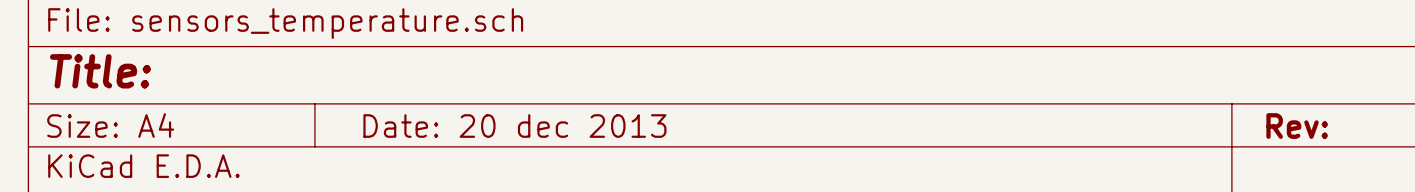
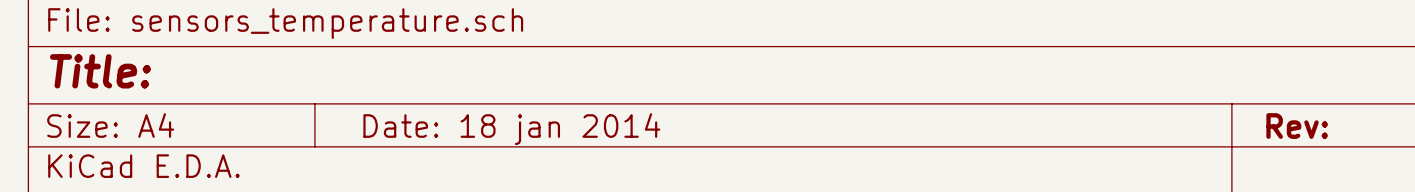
title block: Date: 20 dec 2013 (514, 126) -> Date: 18 jan 2014 (511, 129)

